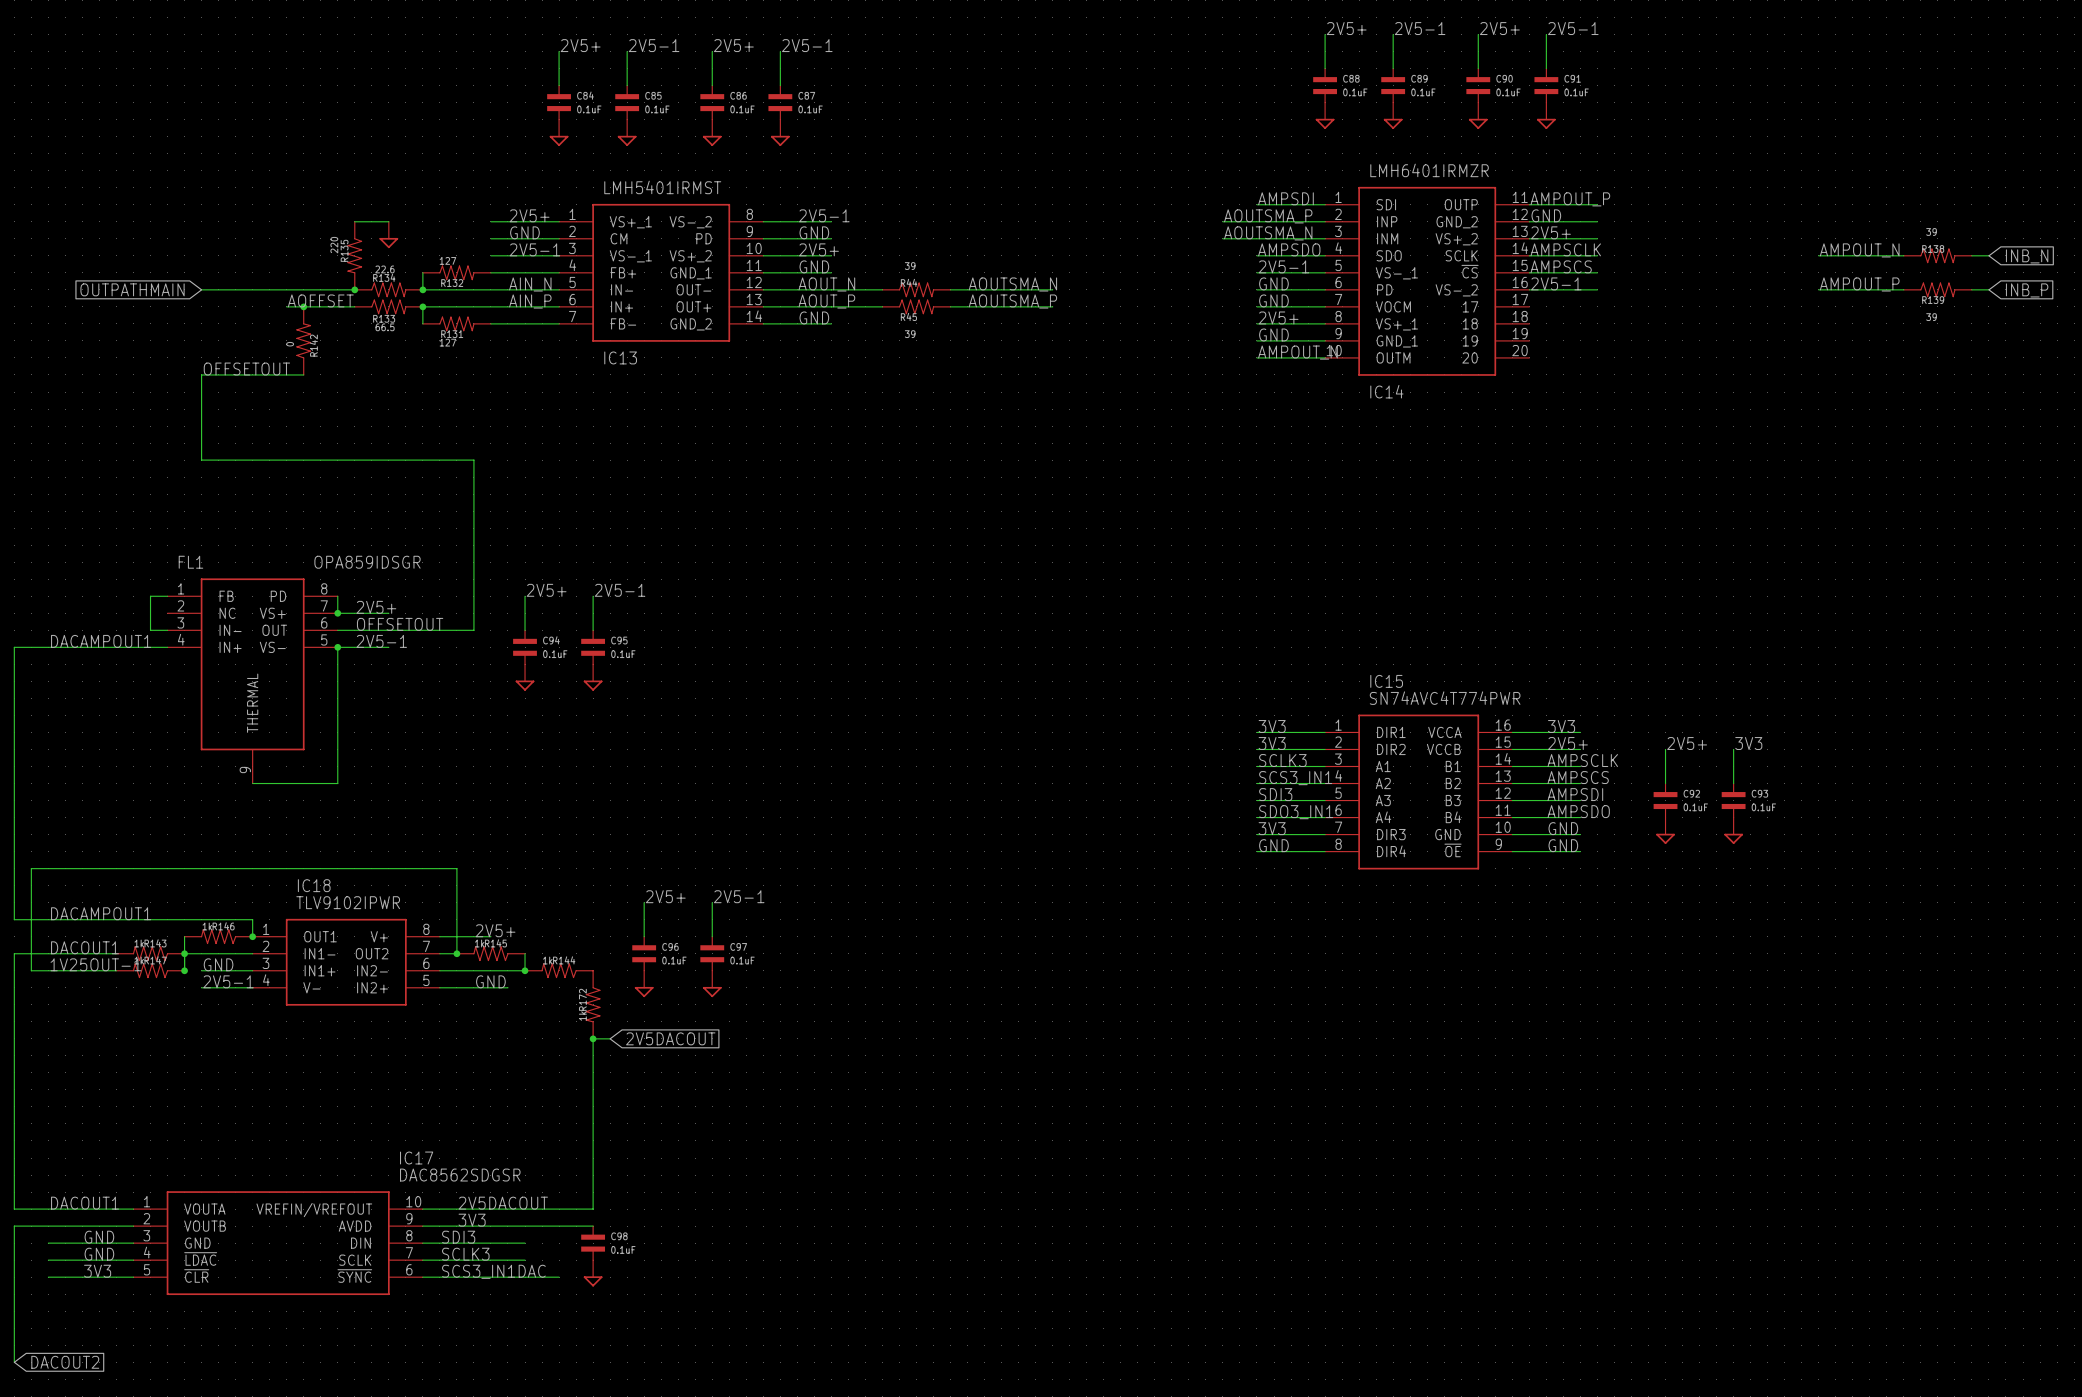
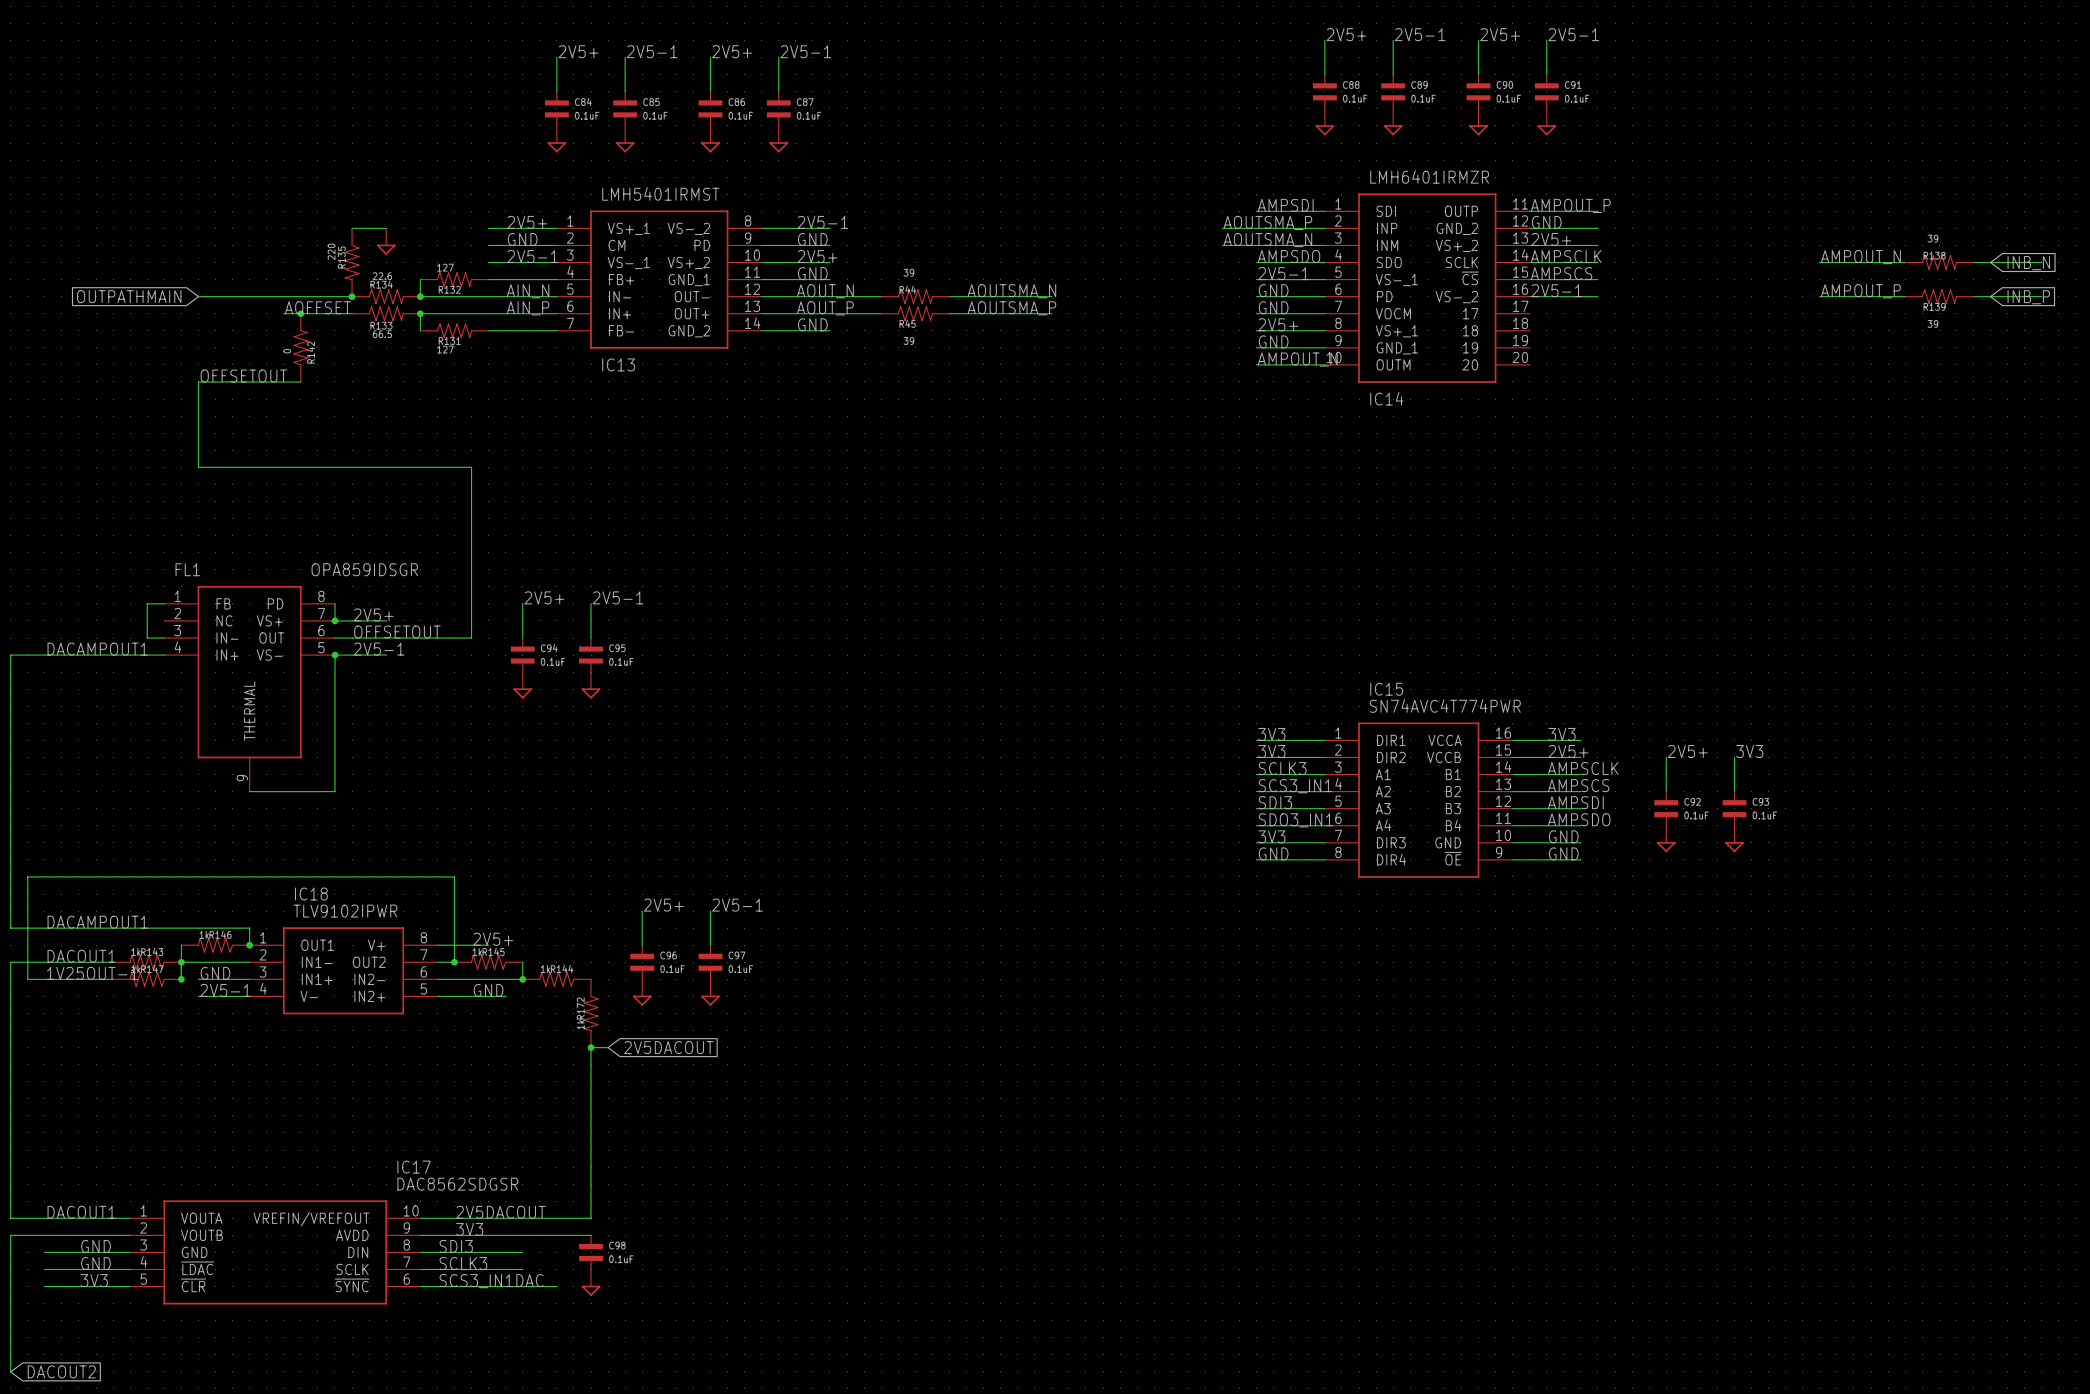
wire: none -> (1990, 262) (2041, 262)
wire: none -> (1990, 296) (2041, 296)

